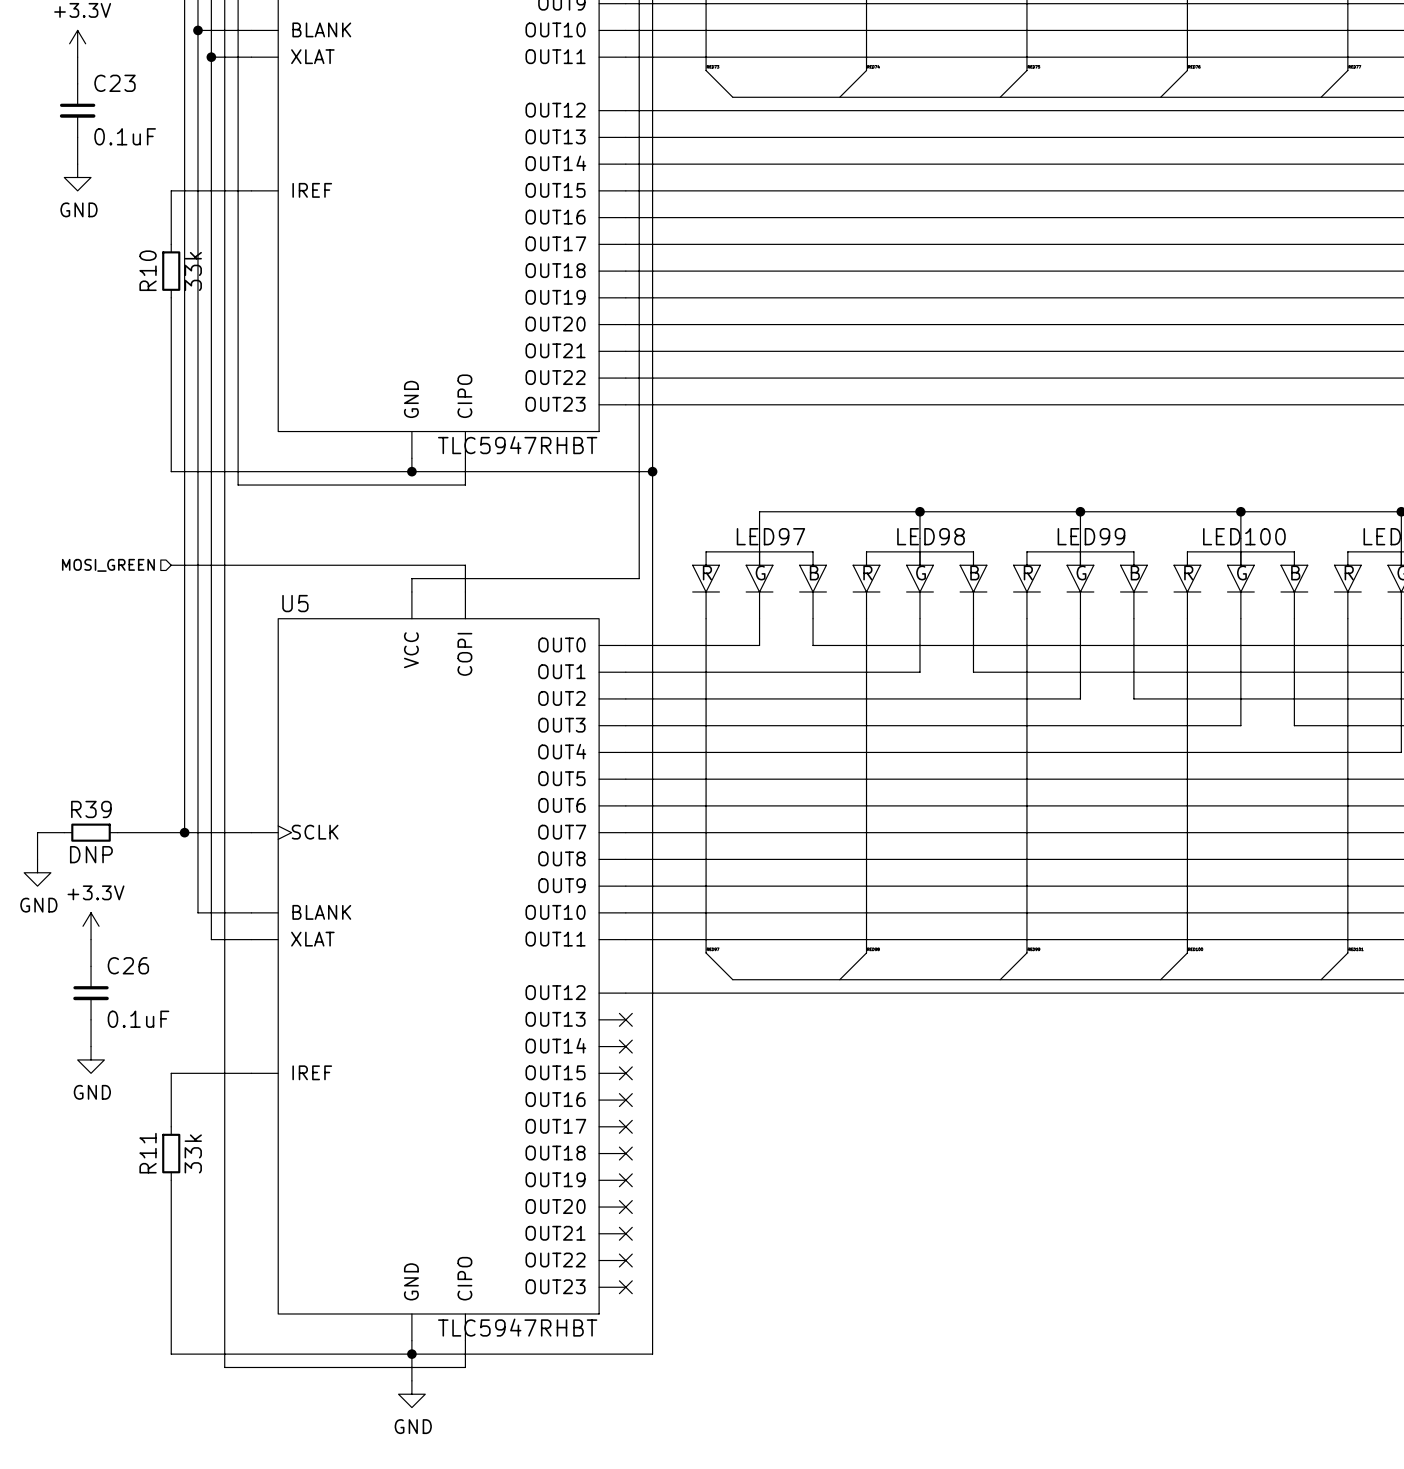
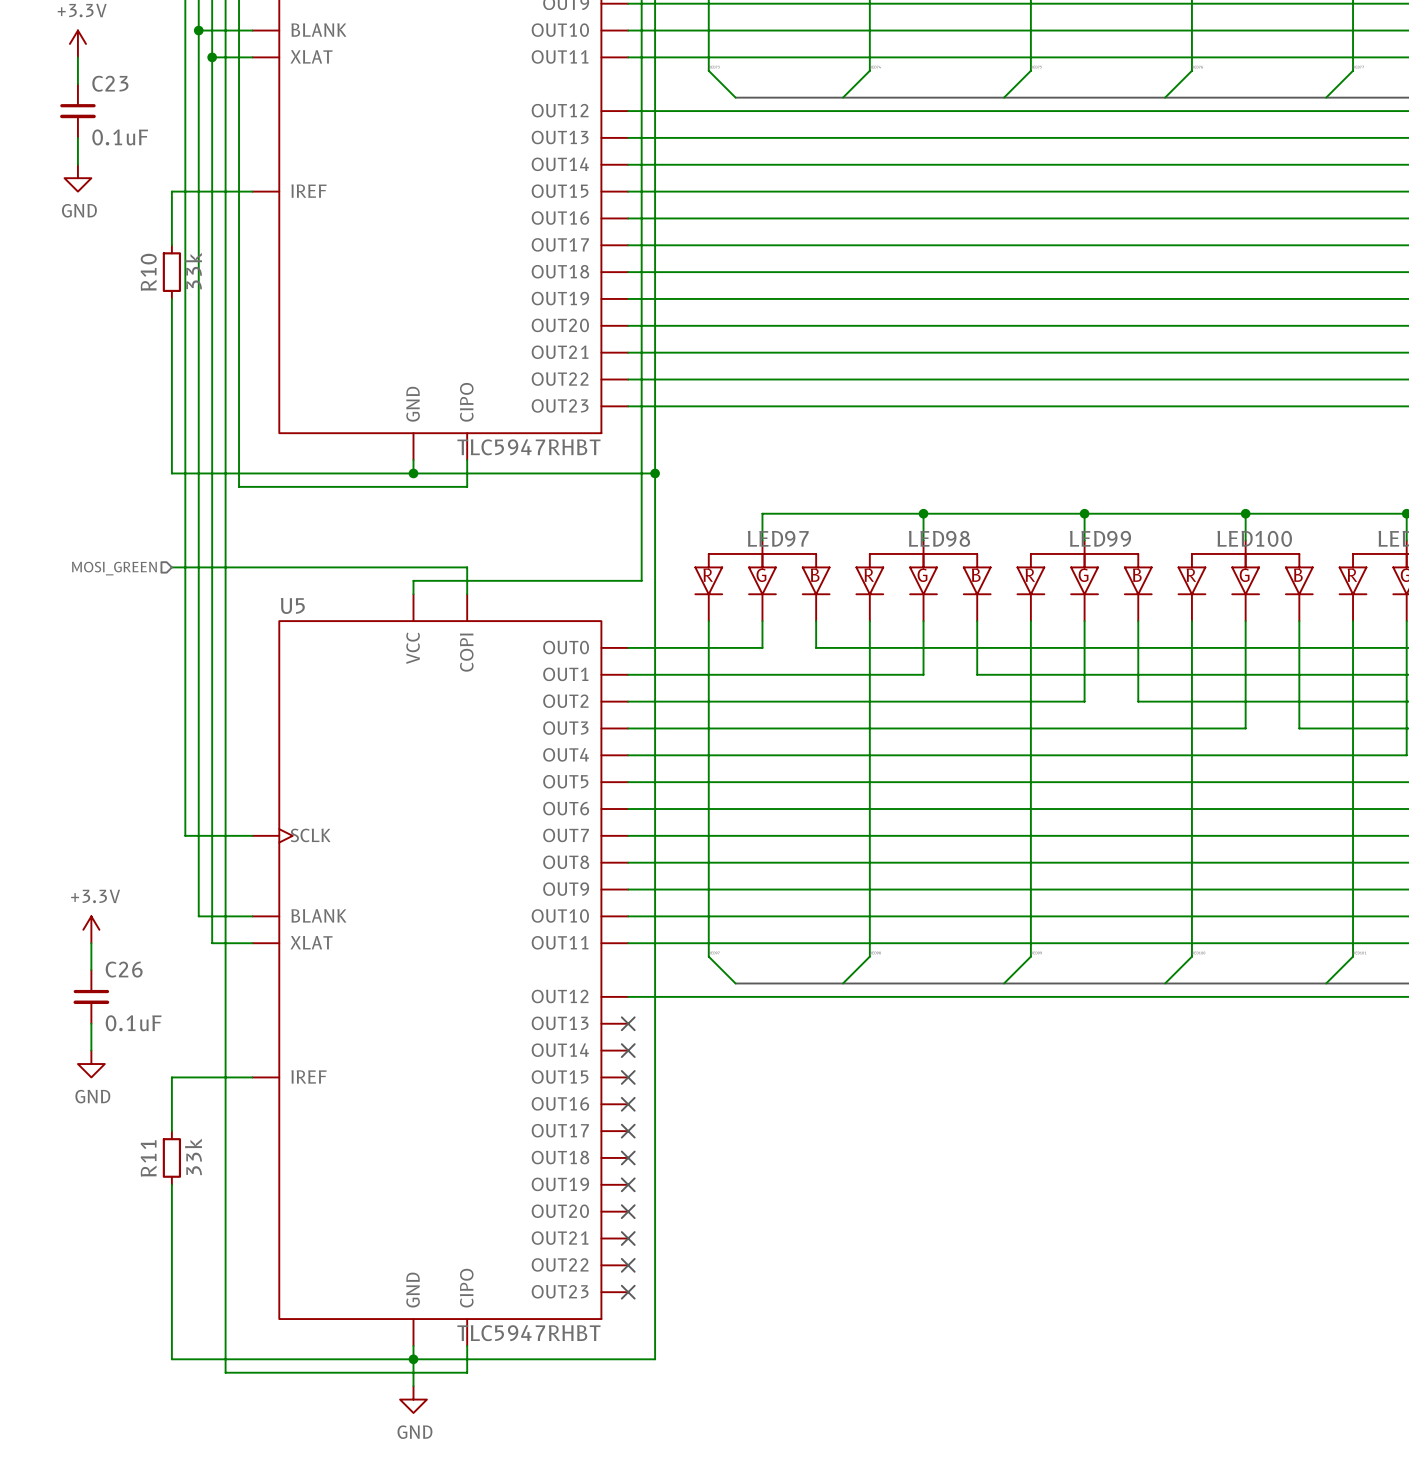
wire: (64, 832) (37, 832) (37, 859) -> none
R39: DNP (91, 832) -> none
wire: (117, 832) (184, 832) -> none
junction: (184, 832) -> none
power symbol: GND (37, 872) -> none

